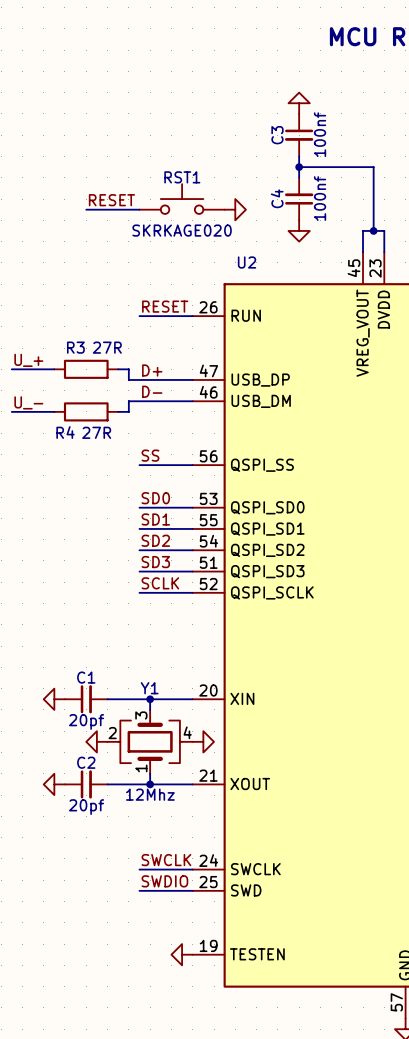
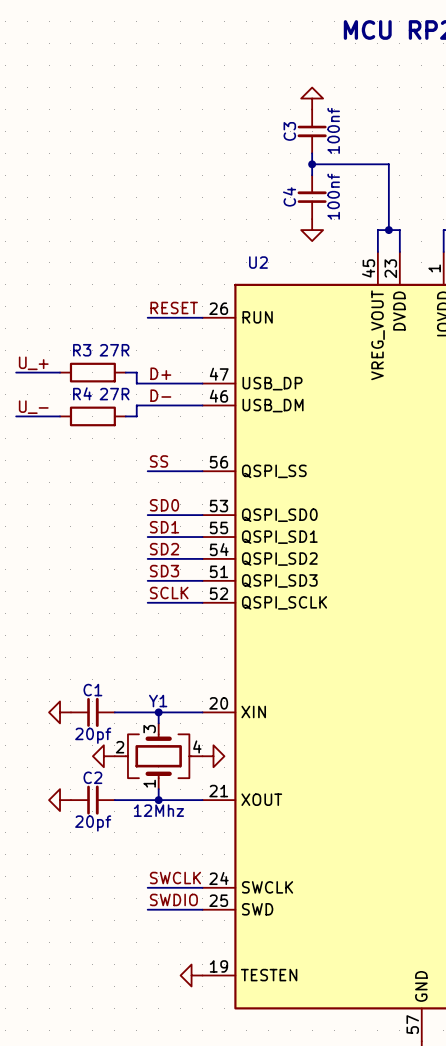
RST1: SKRKAGE020 (182, 199) -> none
label: RESET (111, 200) -> none
wire: (86, 209) (139, 209) -> none
power symbol: (235, 209) -> none
R4 name position: R4 (65, 432) -> R4 (82, 393)
R4 value position: 27R (96, 432) -> 27R (114, 394)

